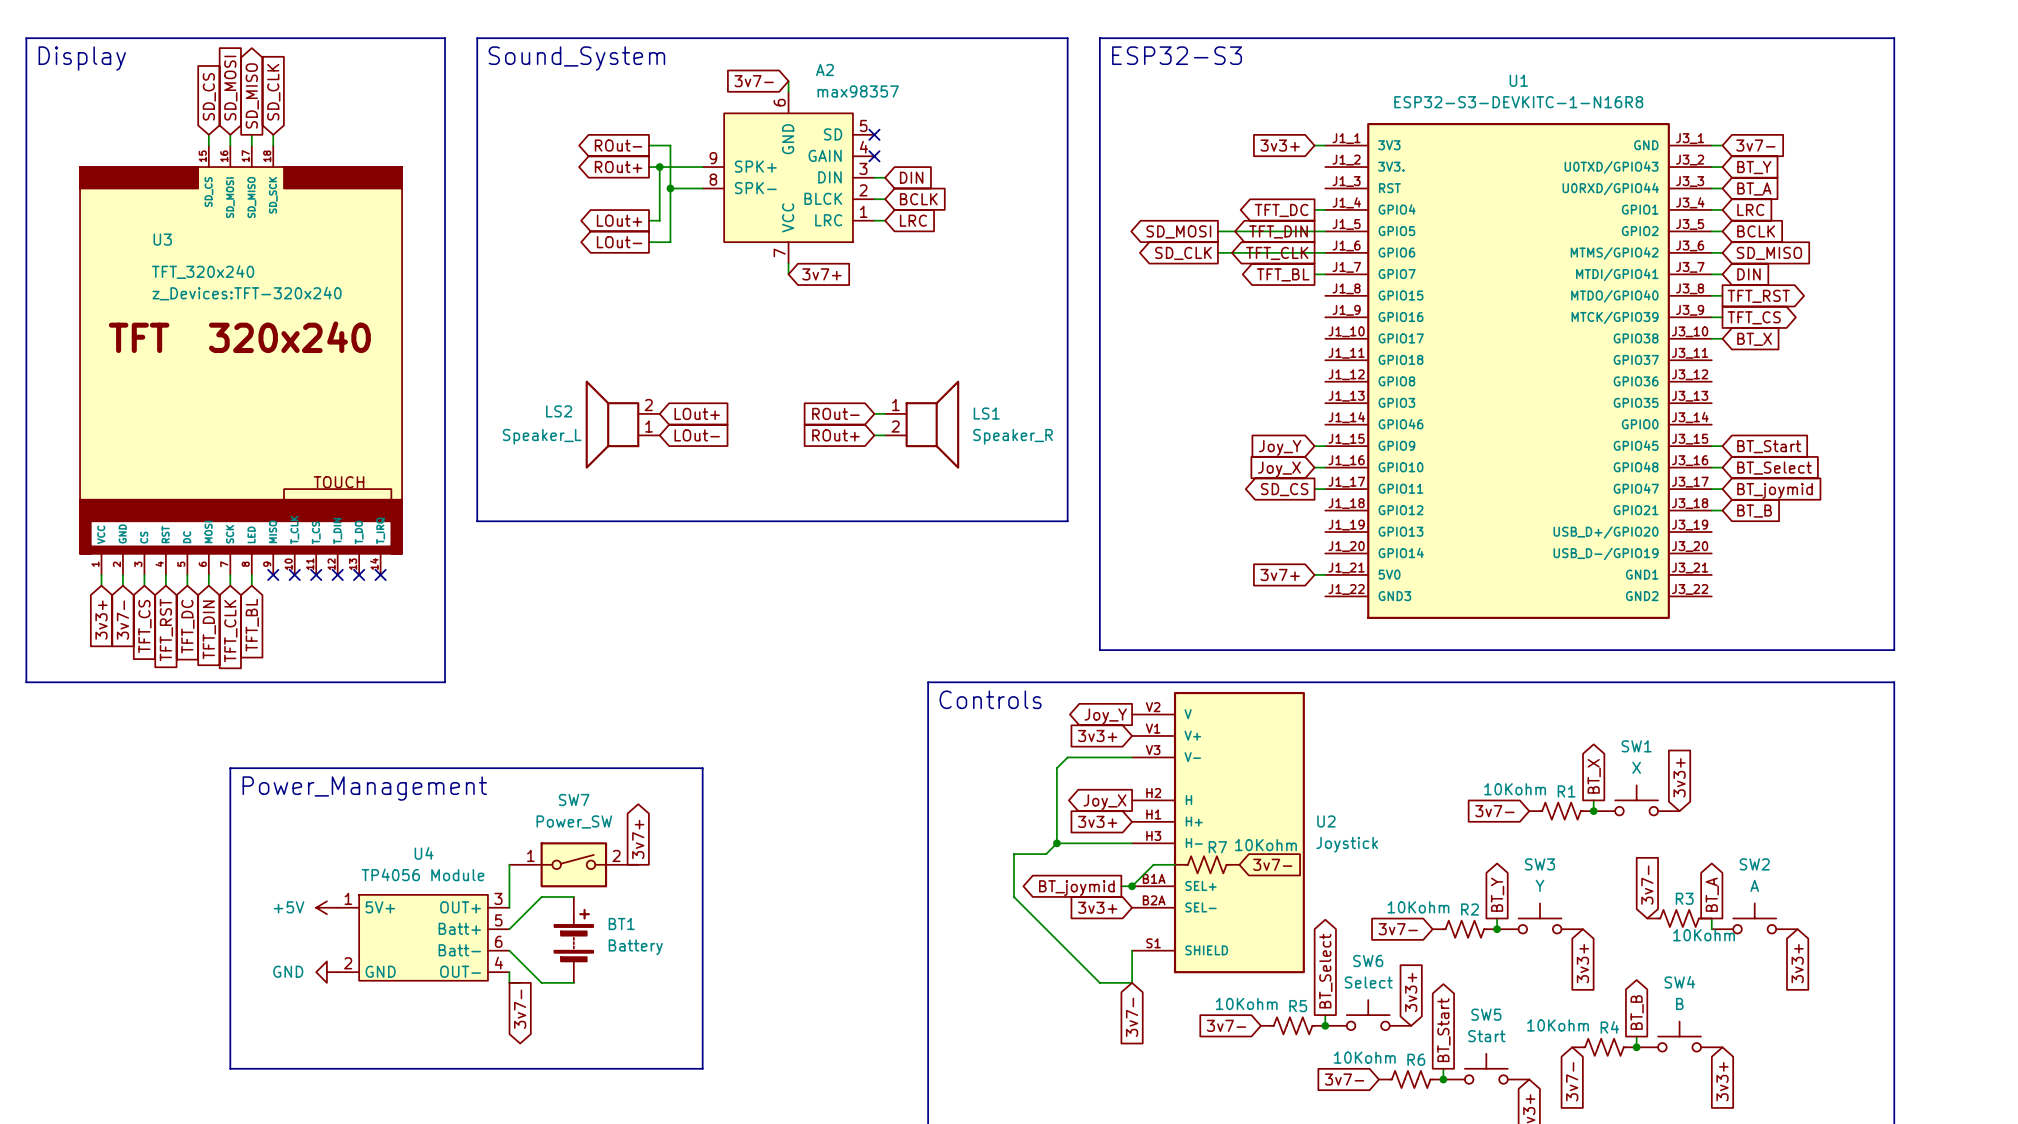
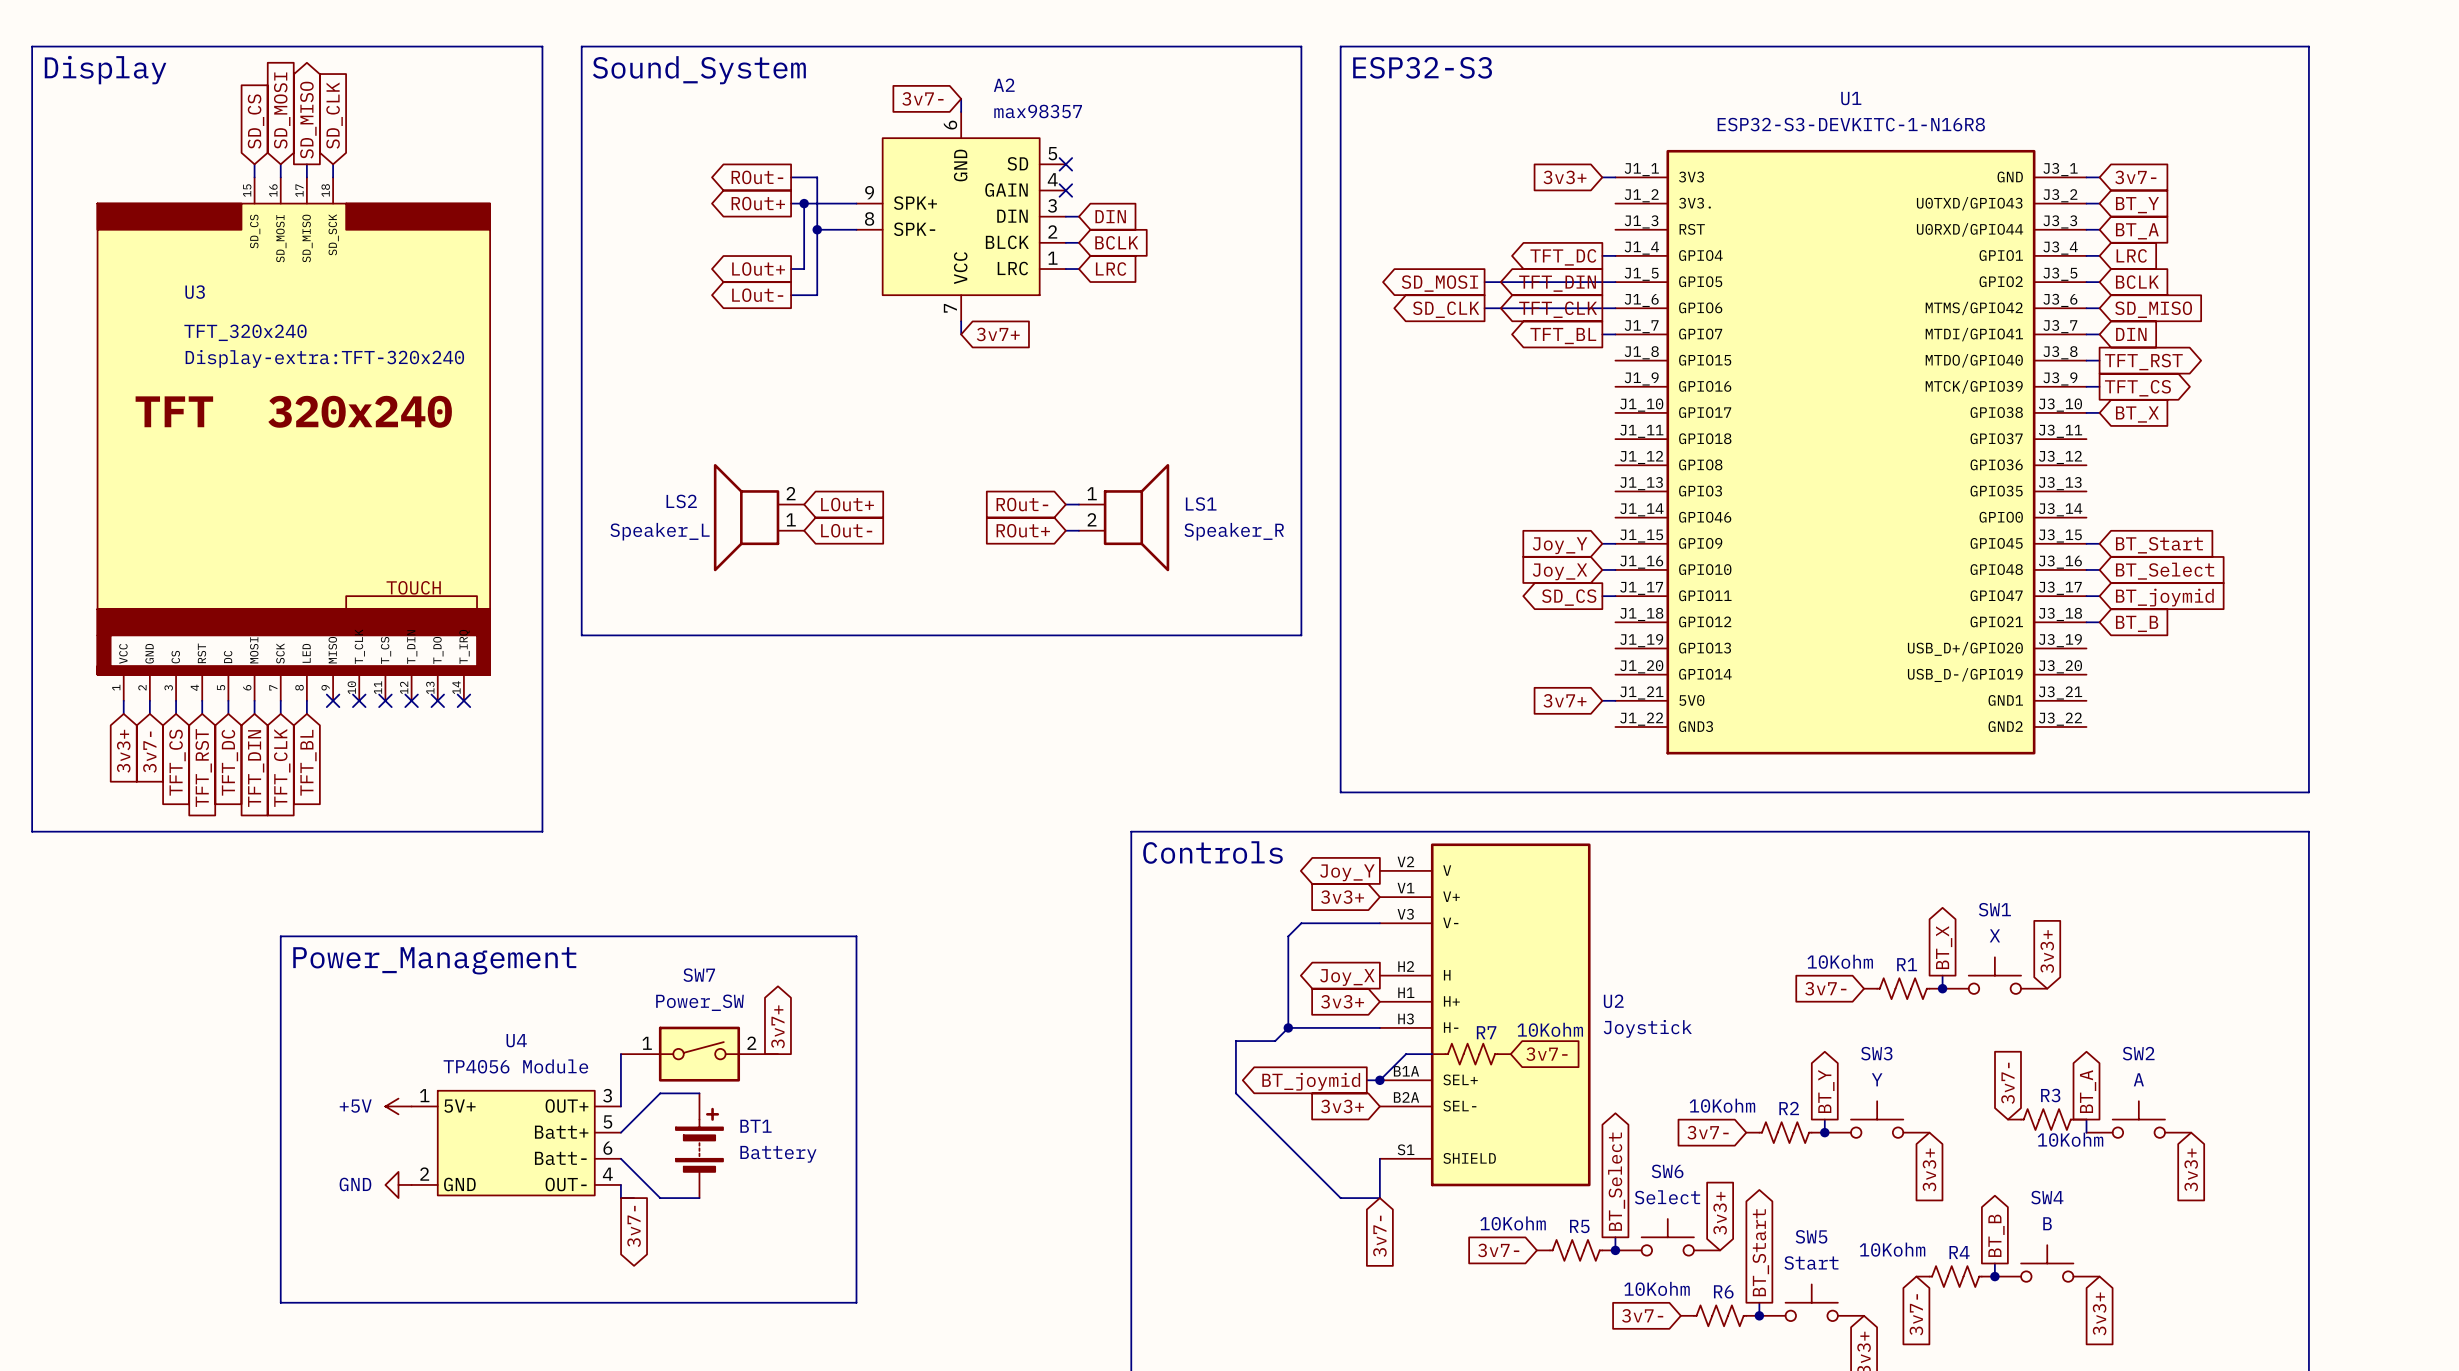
U3 text: z_Devices:TFT-320x240 (247, 293) -> Display-extra:TFT-320x240 (324, 358)

